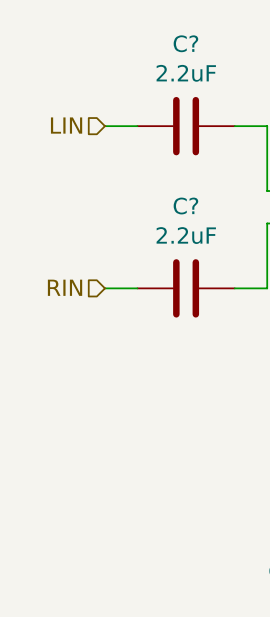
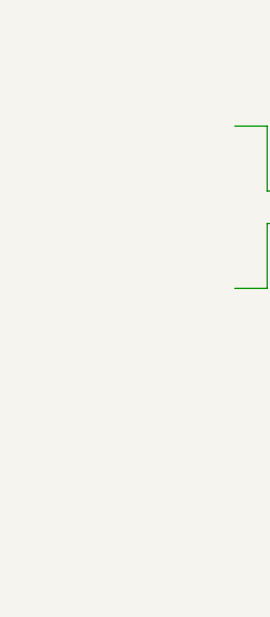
hierarchical label: LIN (66, 125) -> none
wire: (104, 126) (137, 126) -> none
C?: 2.2uF (186, 126) -> none
hierarchical label: RIN (65, 287) -> none
wire: (104, 288) (137, 288) -> none
C?: 2.2uF (186, 288) -> none

